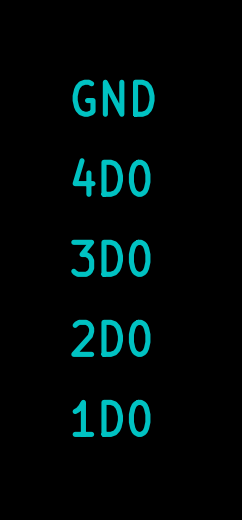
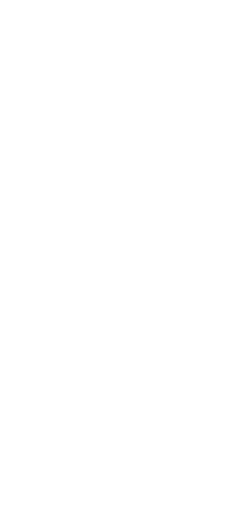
text: GND (113, 98) -> none
text: 4D0 (111, 177) -> none
text: 3D0 (110, 258) -> none
text: 2D0 (110, 338) -> none
text: 1D0 (111, 418) -> none

